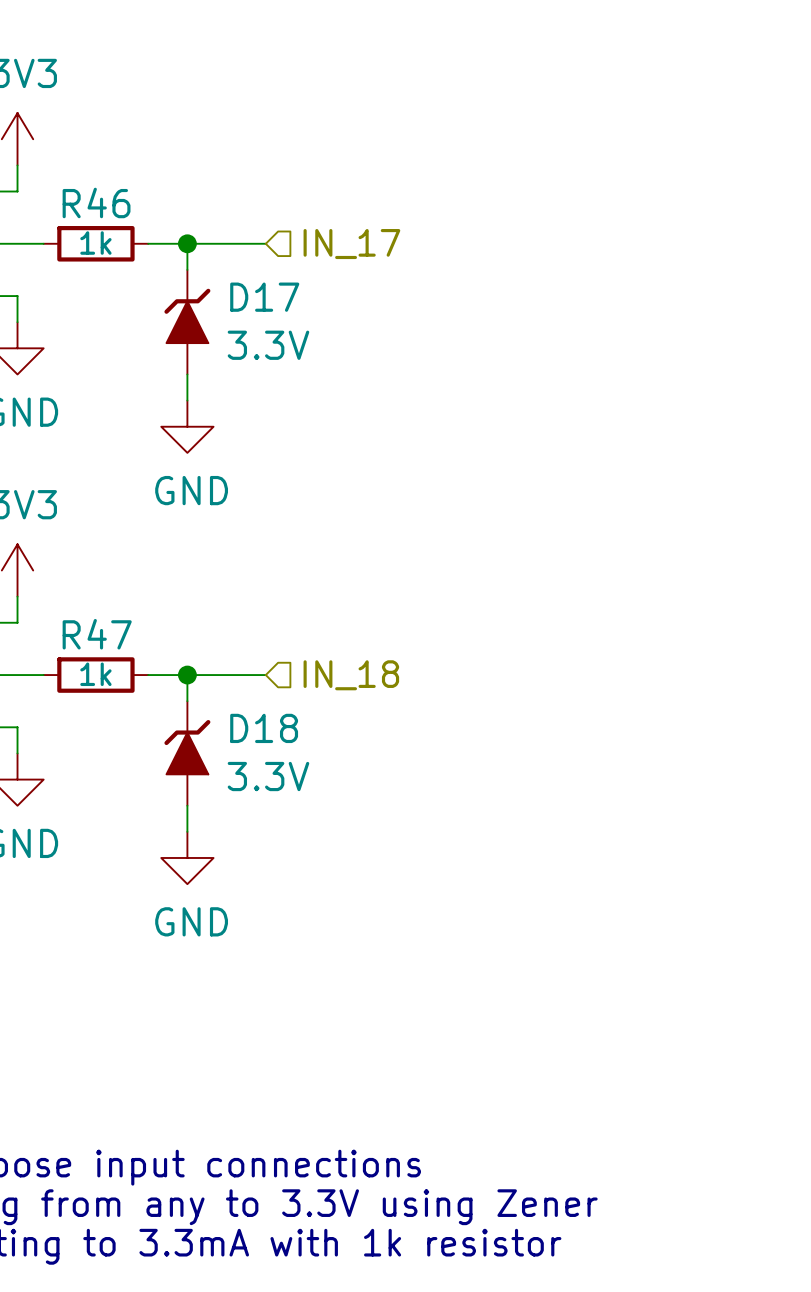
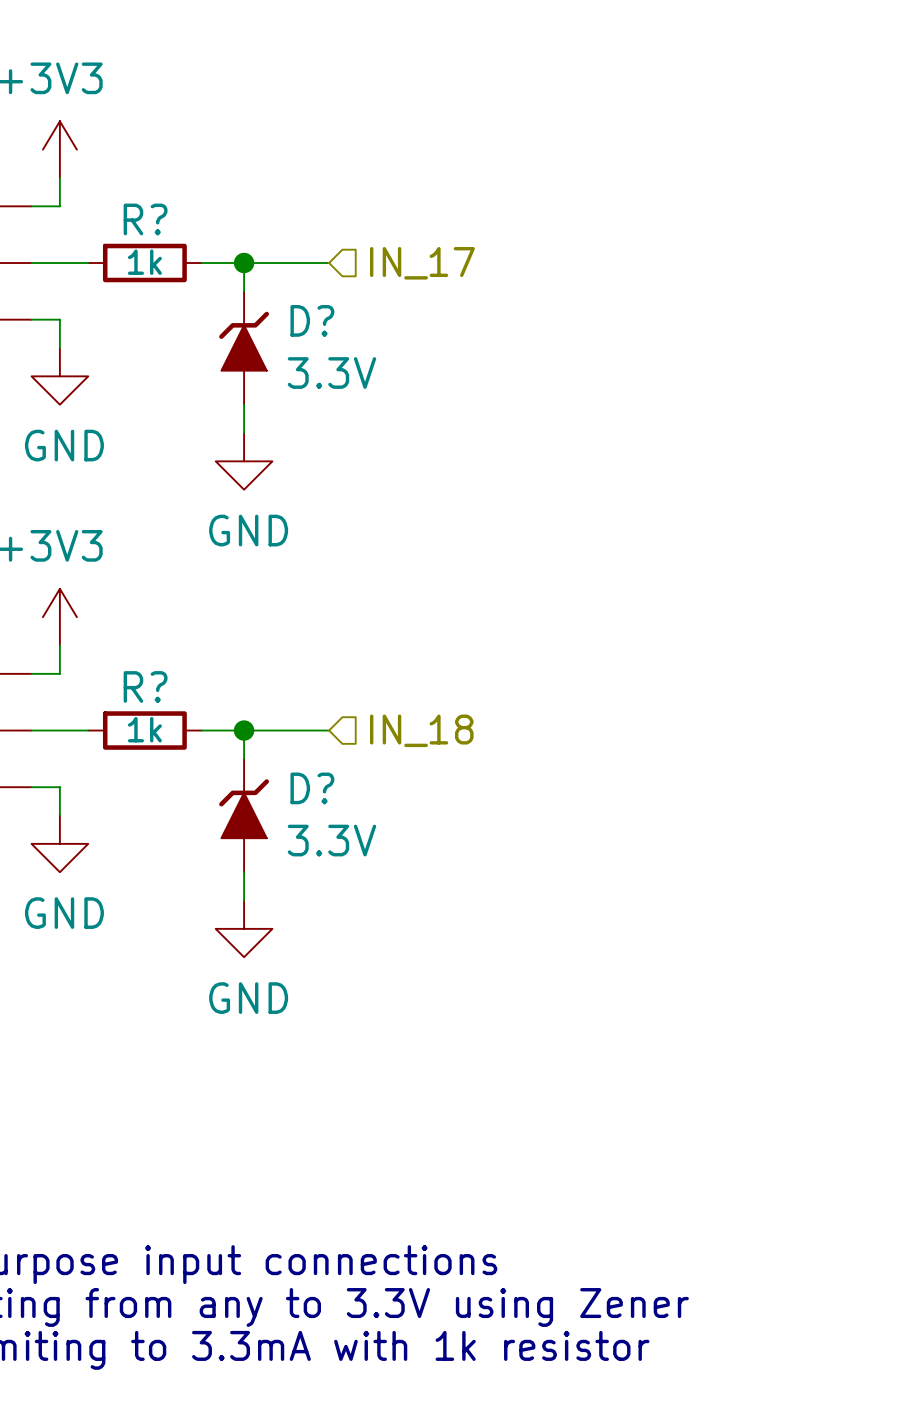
R46 name: R46 (96, 202) -> R? (145, 219)
D17 name: D17 (264, 297) -> D? (312, 320)
R47 name: R47 (97, 634) -> R? (145, 686)
D18 name: D18 (264, 728) -> D? (312, 788)

